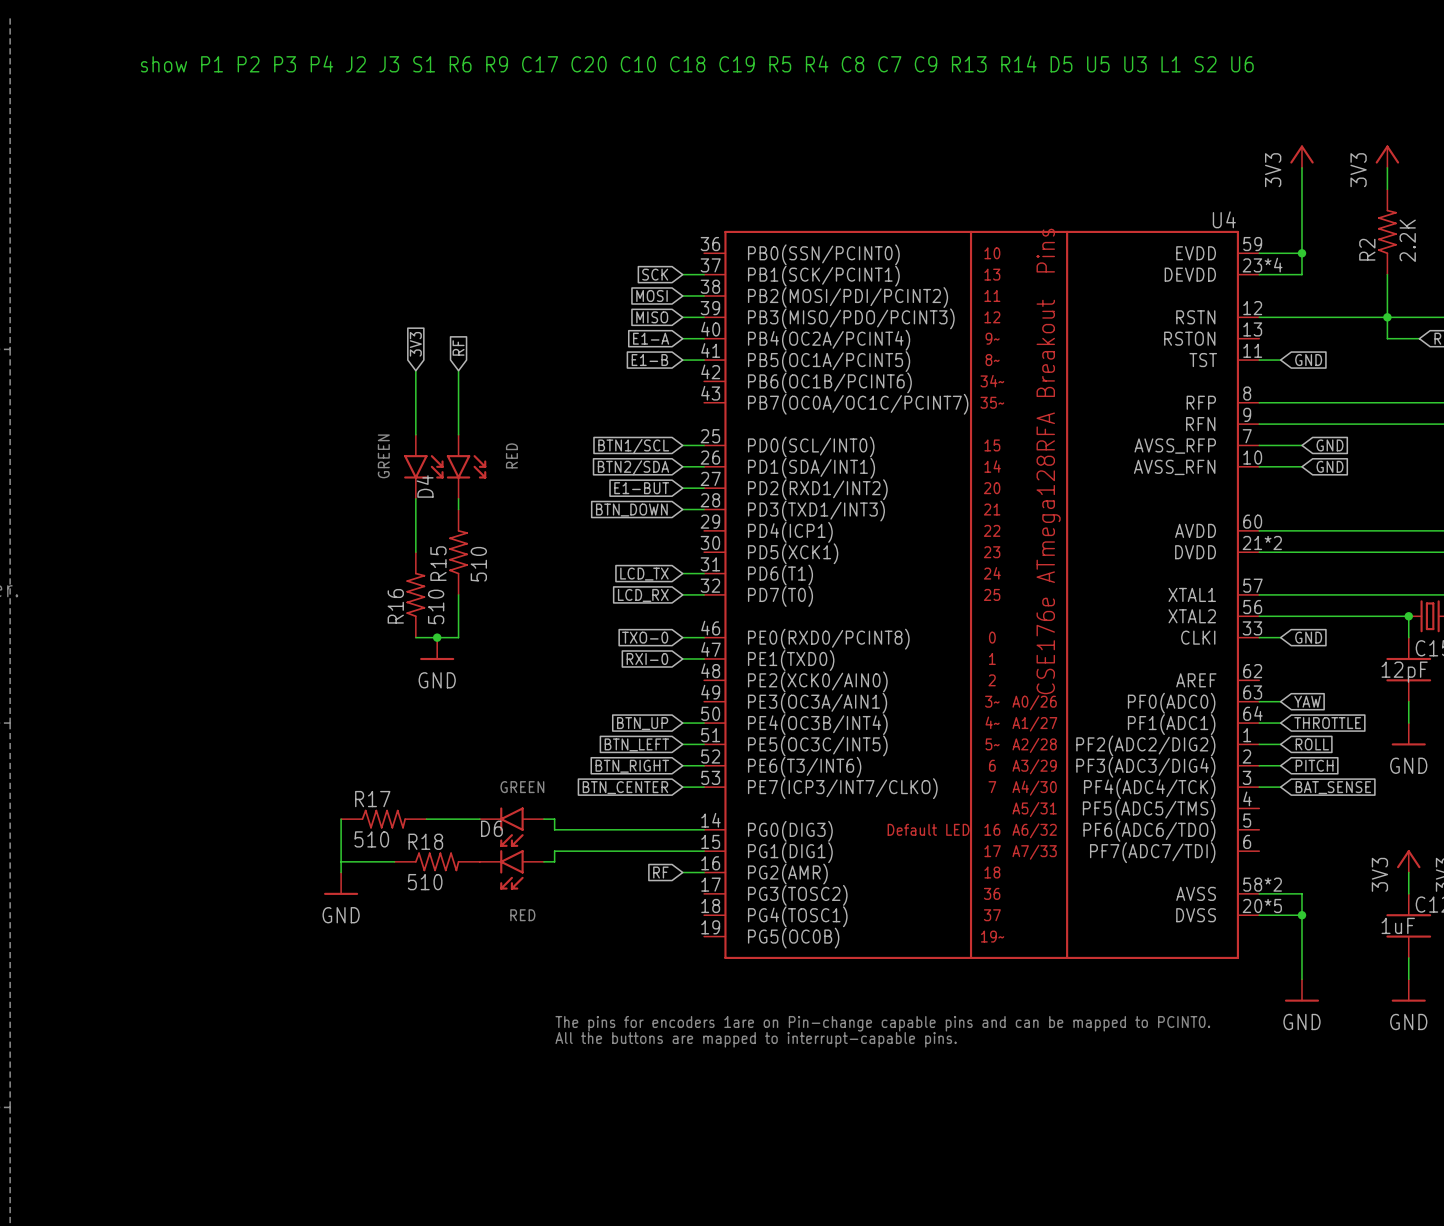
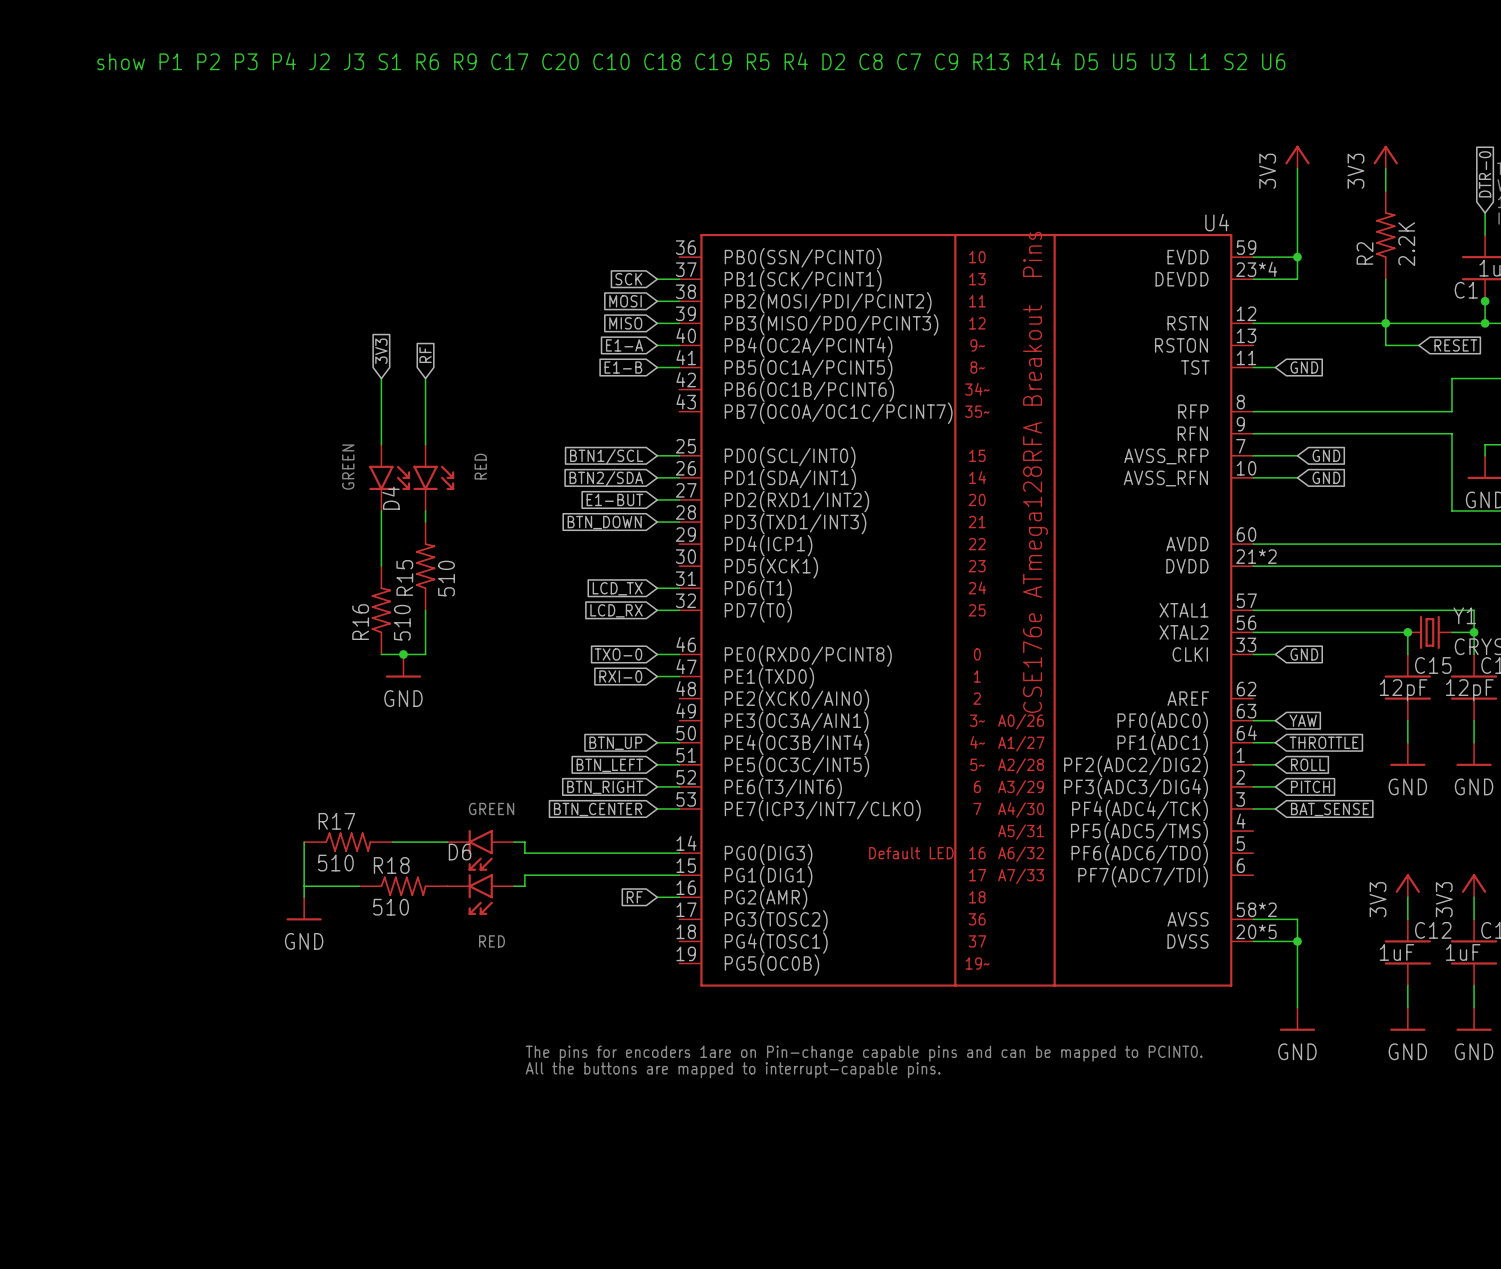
text: show P1 P2 P3 P4 J2 J3 S1 R6 R9 C17 C20 C10 C18 C19 R5 R4 C8 C7 C9 R13 R14 D5 U5 U3 L1 S2 U6 (697, 63) -> show P1 P2 P3 P4 J2 J3 S1 R6 R9 C17 C20 C10 C18 C19 R5 R4 D2 C8 C7 C9 R13 R14 D5 U5 U3 L1 S2 U6 (691, 61)

